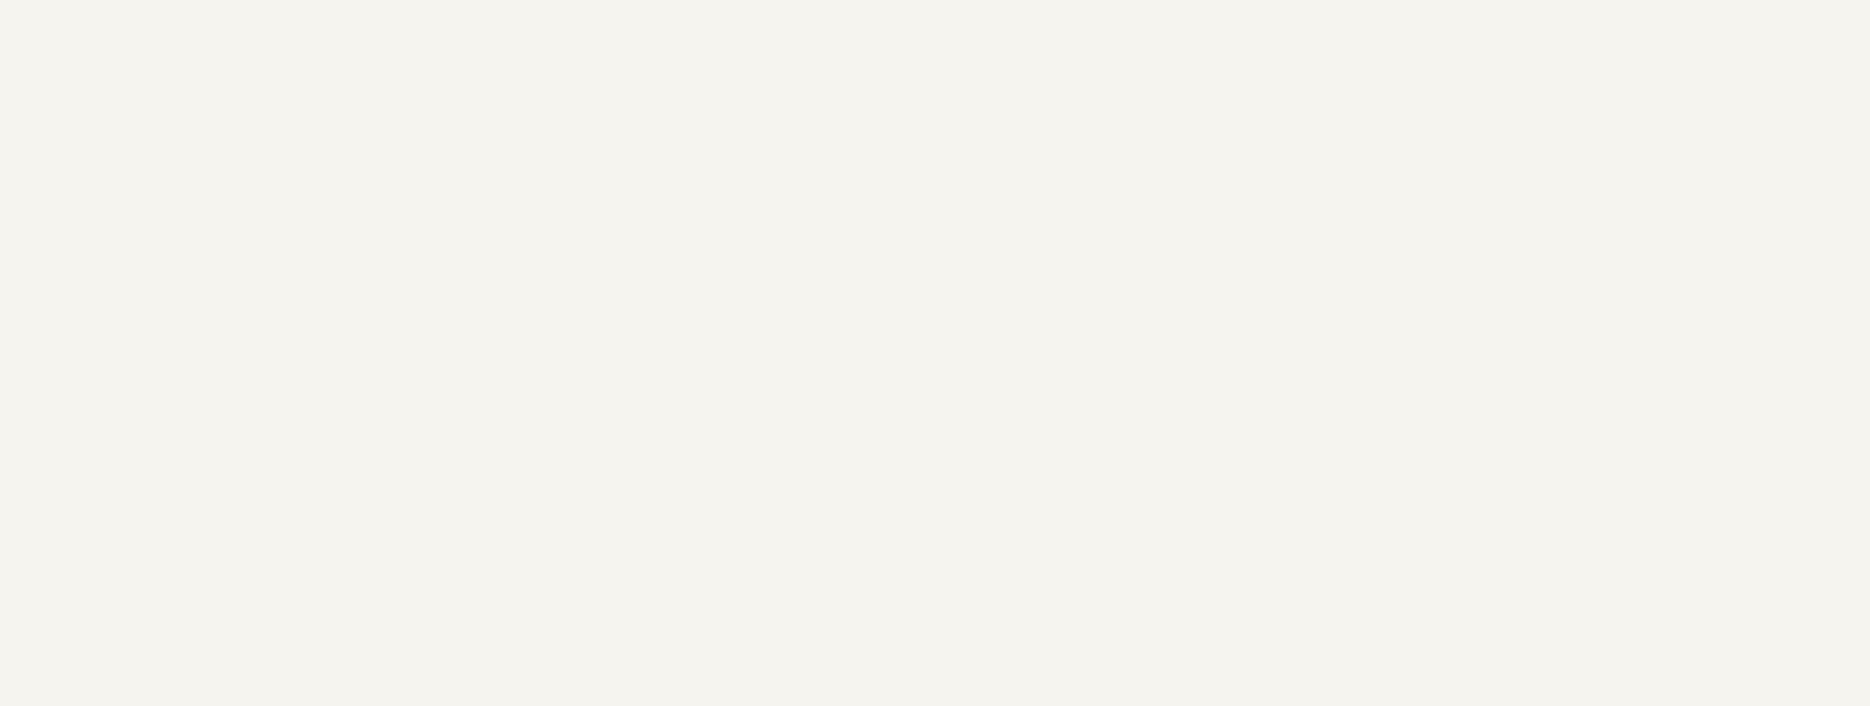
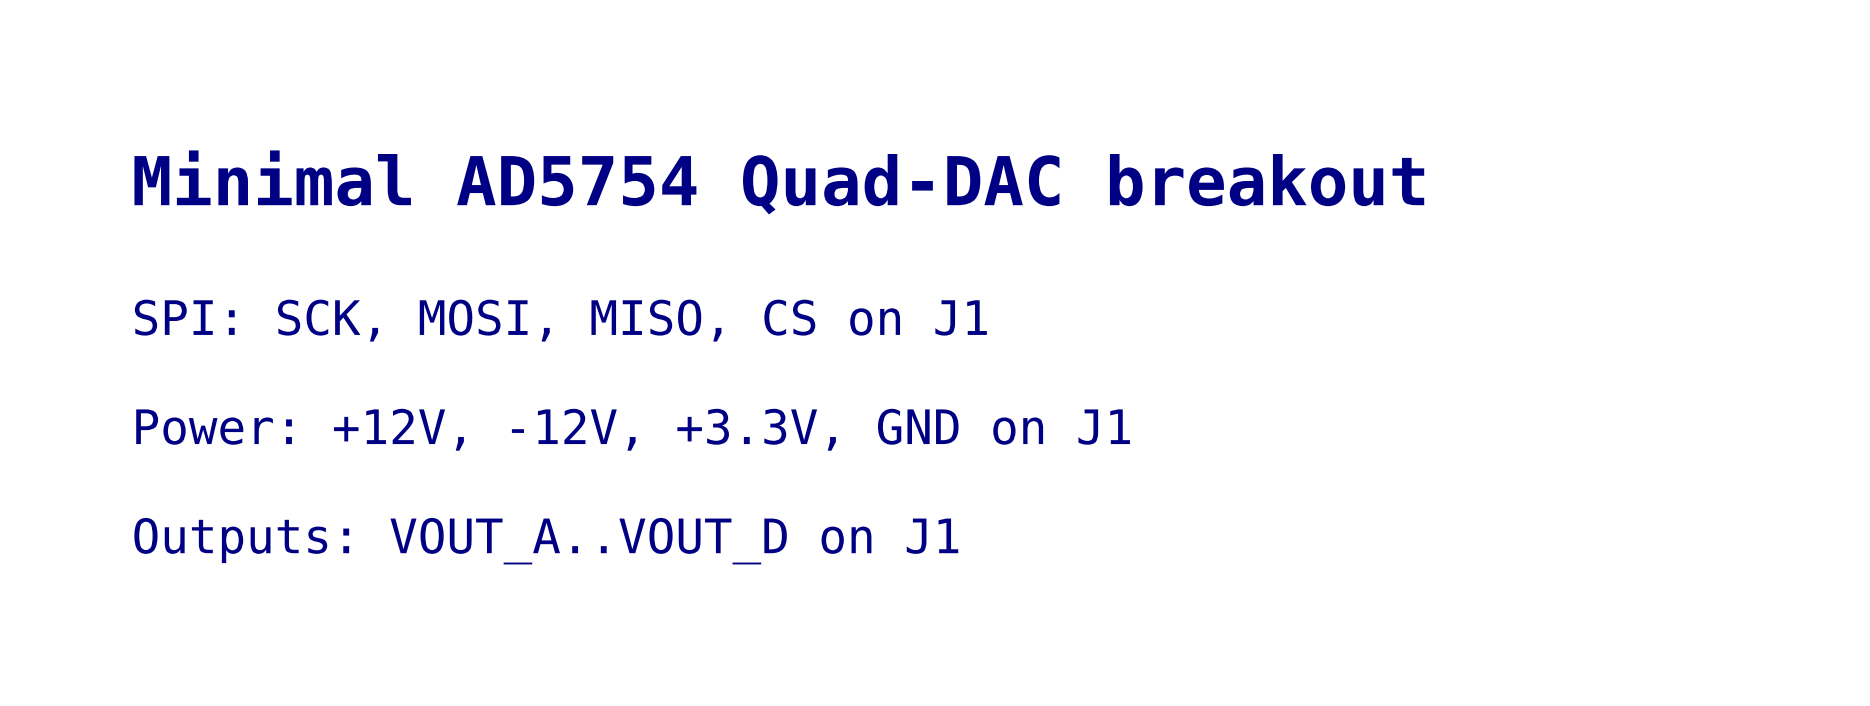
text: none -> Minimal AD5754 Quad-DAC breakout (779, 182)
text: none -> SPI: SCK, MOSI, MISO, CS on J1 (560, 320)
text: none -> Power: +12V, -12V, +3.3V, GND on J1 (633, 429)
text: none -> Outputs: VOUT_A..VOUT_D on J1 (546, 541)

